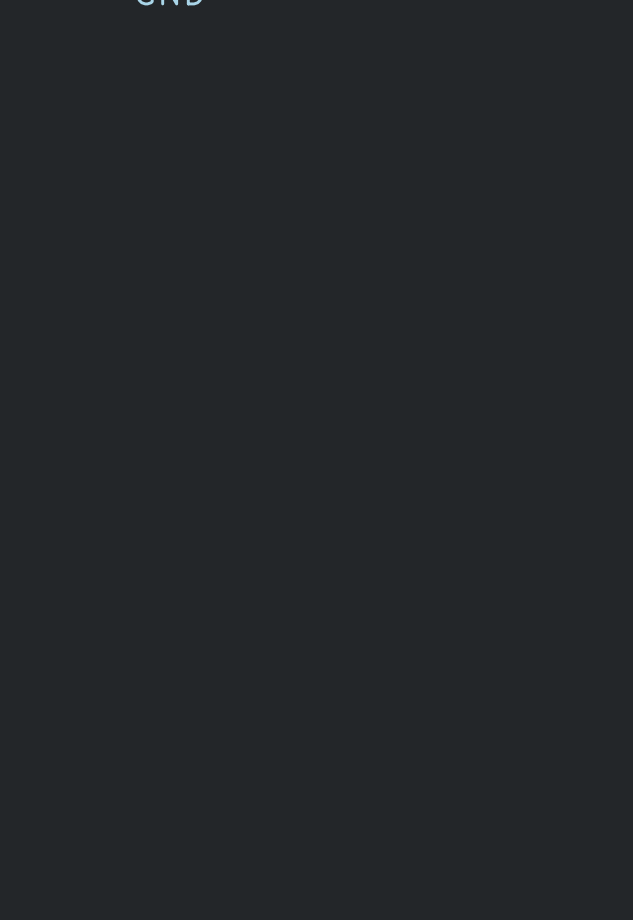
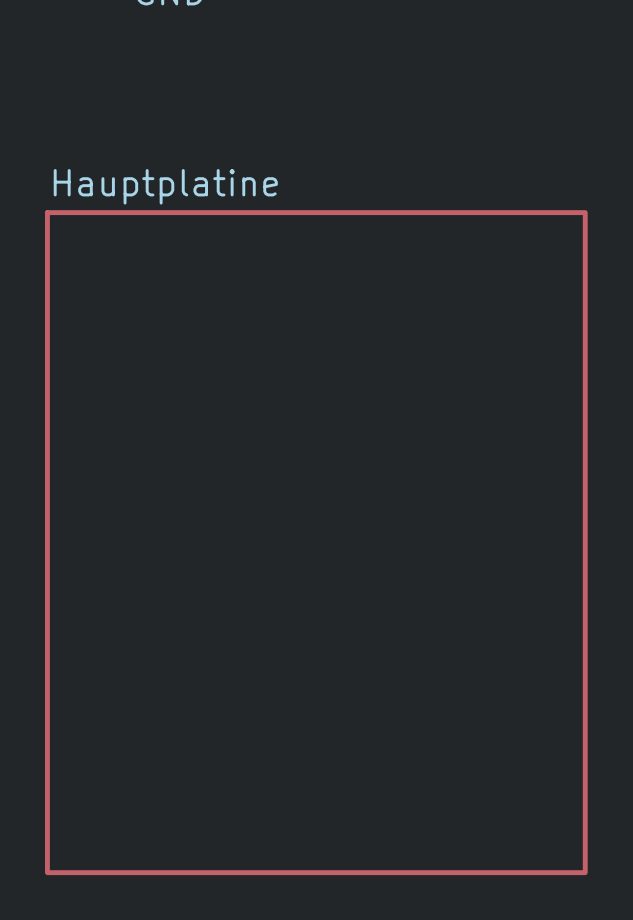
sheet Hauptplatine: none -> (316, 542)

